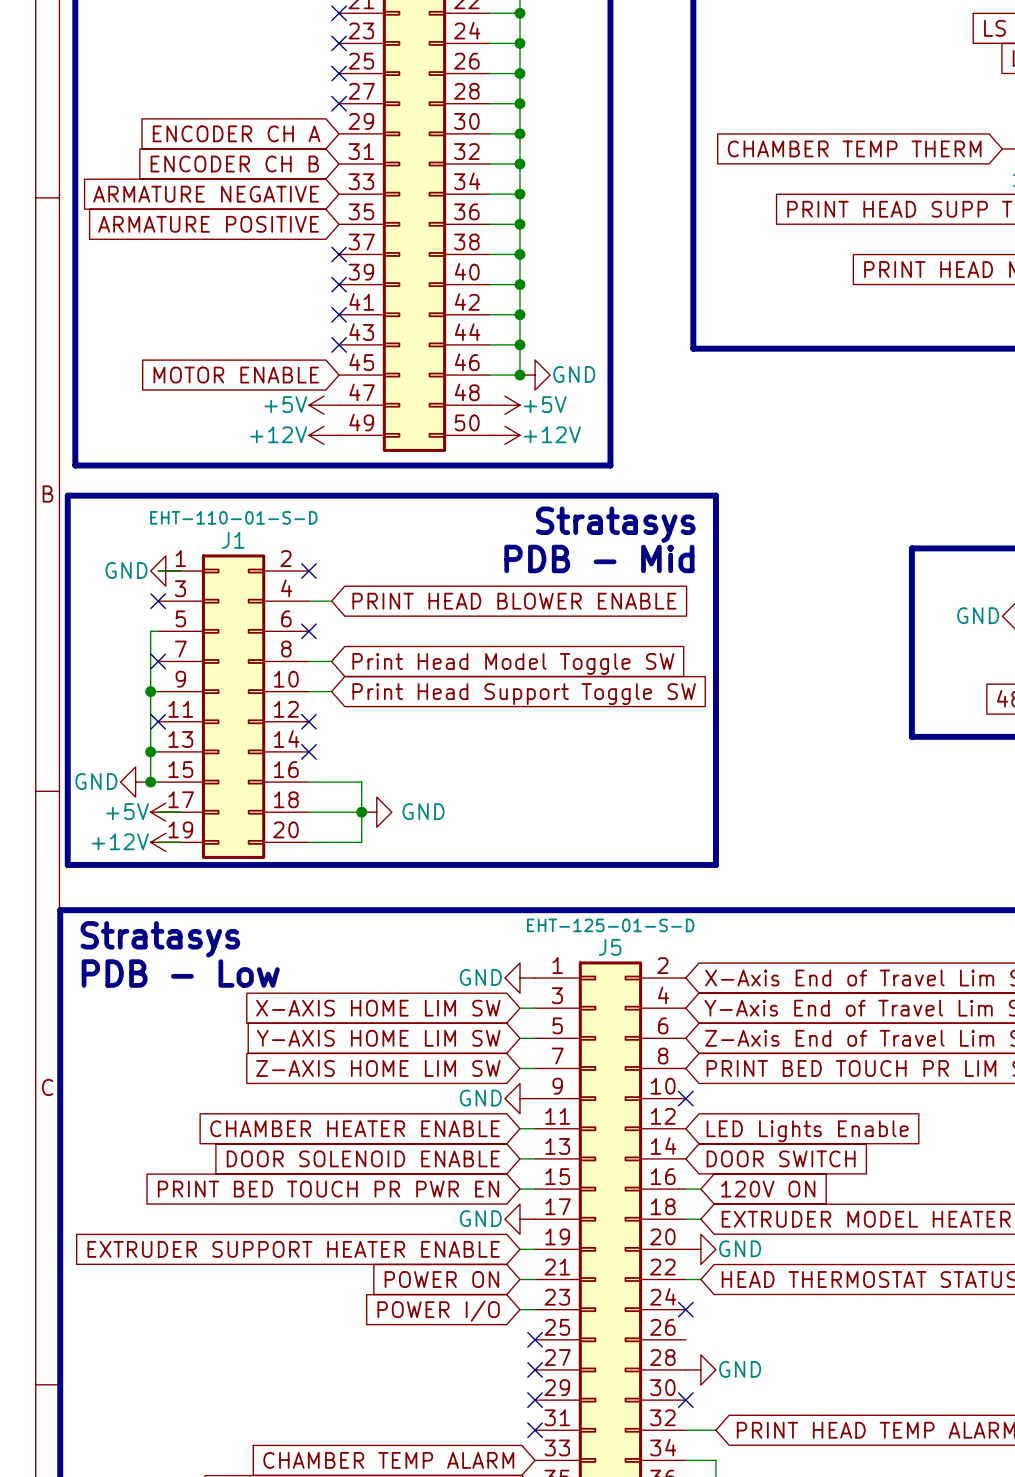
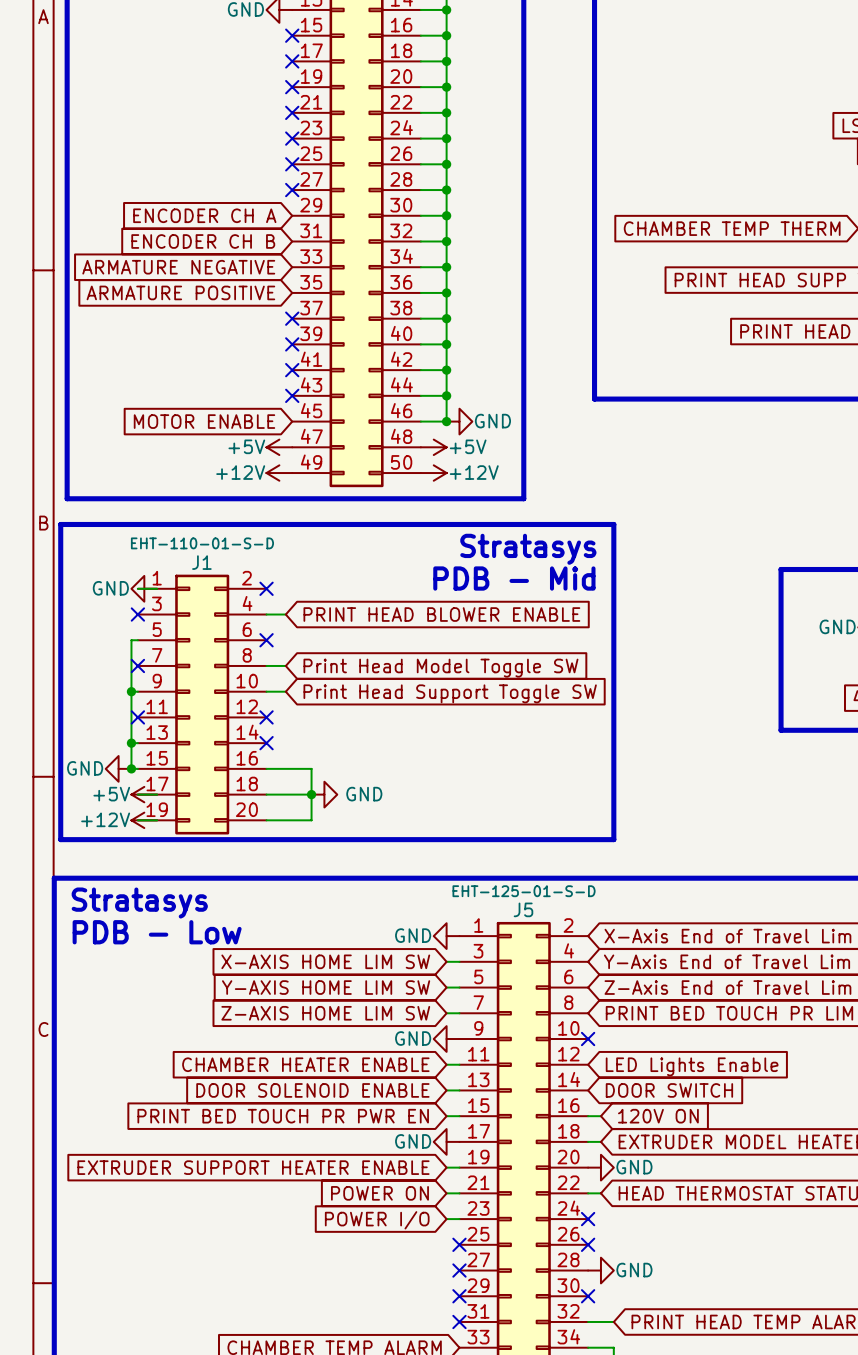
no-connect mark: none -> (588, 1244)

